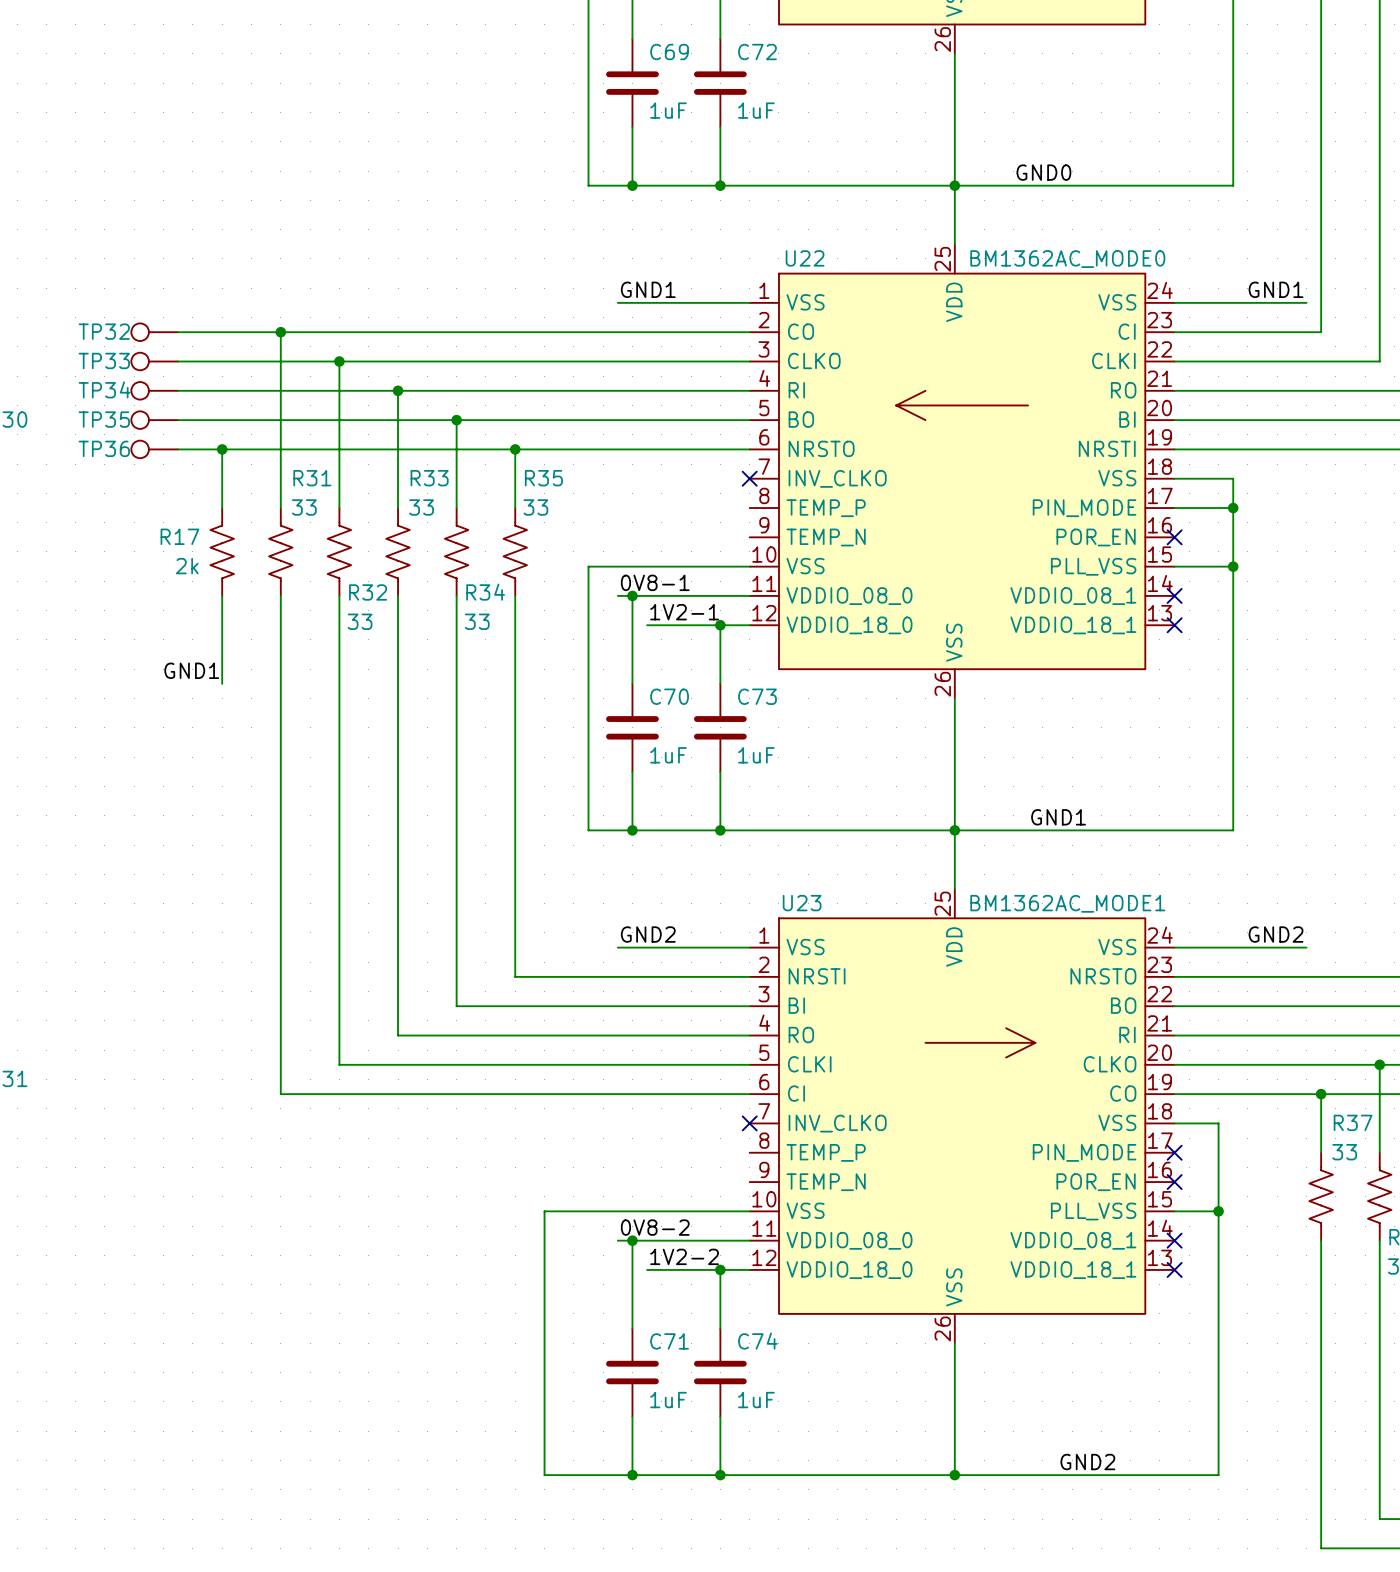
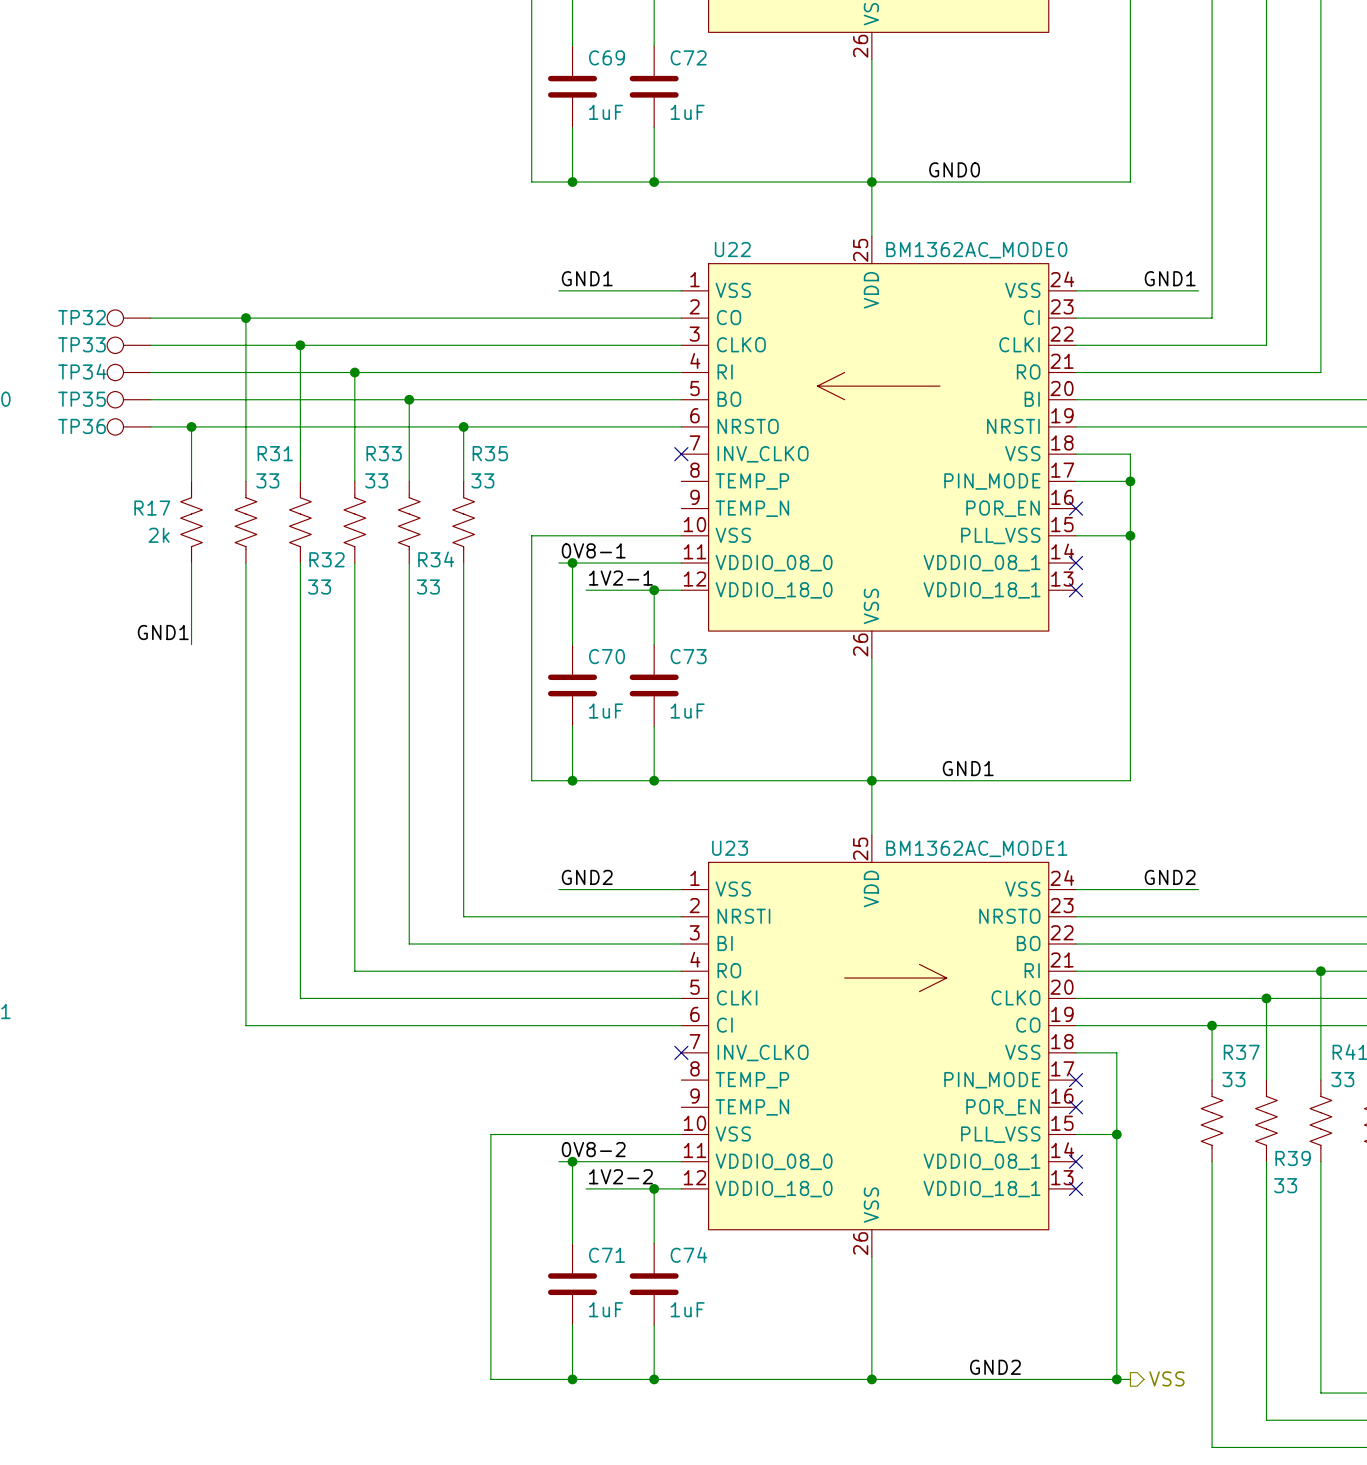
hierarchical label: none -> VSS (1166, 1378)
wire: none -> (1116, 1379) (1130, 1379)
junction: none -> (1116, 1379)

